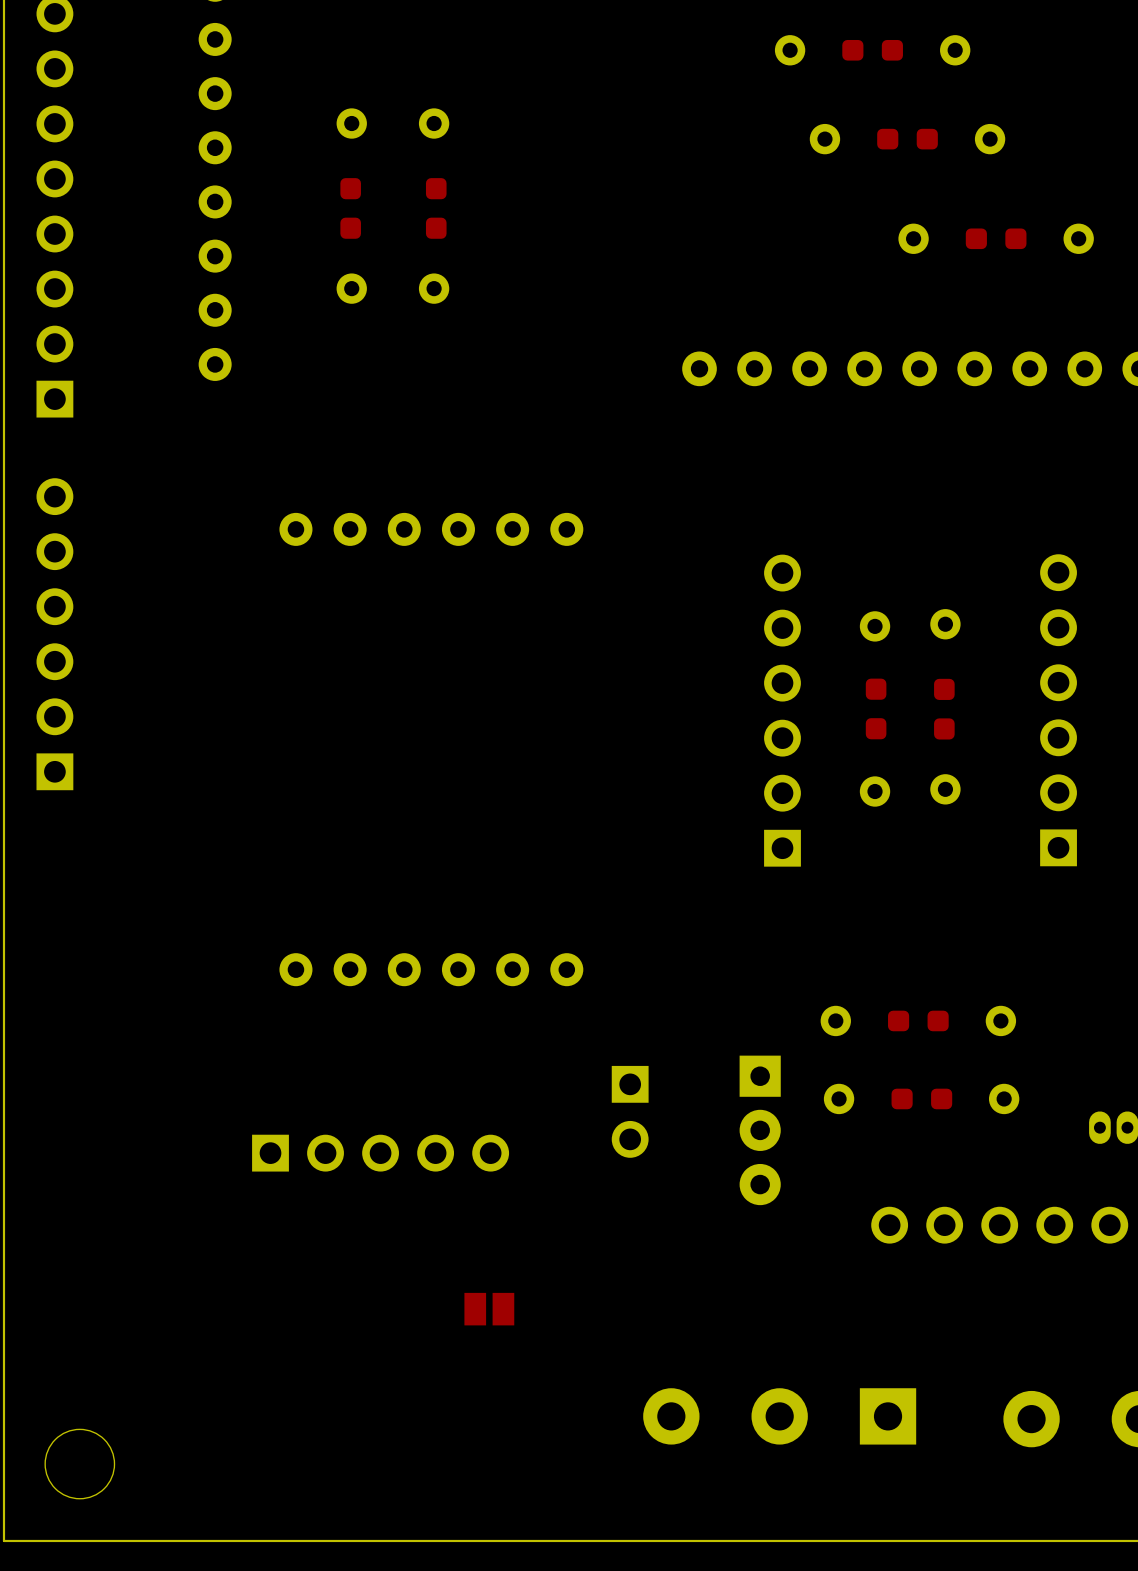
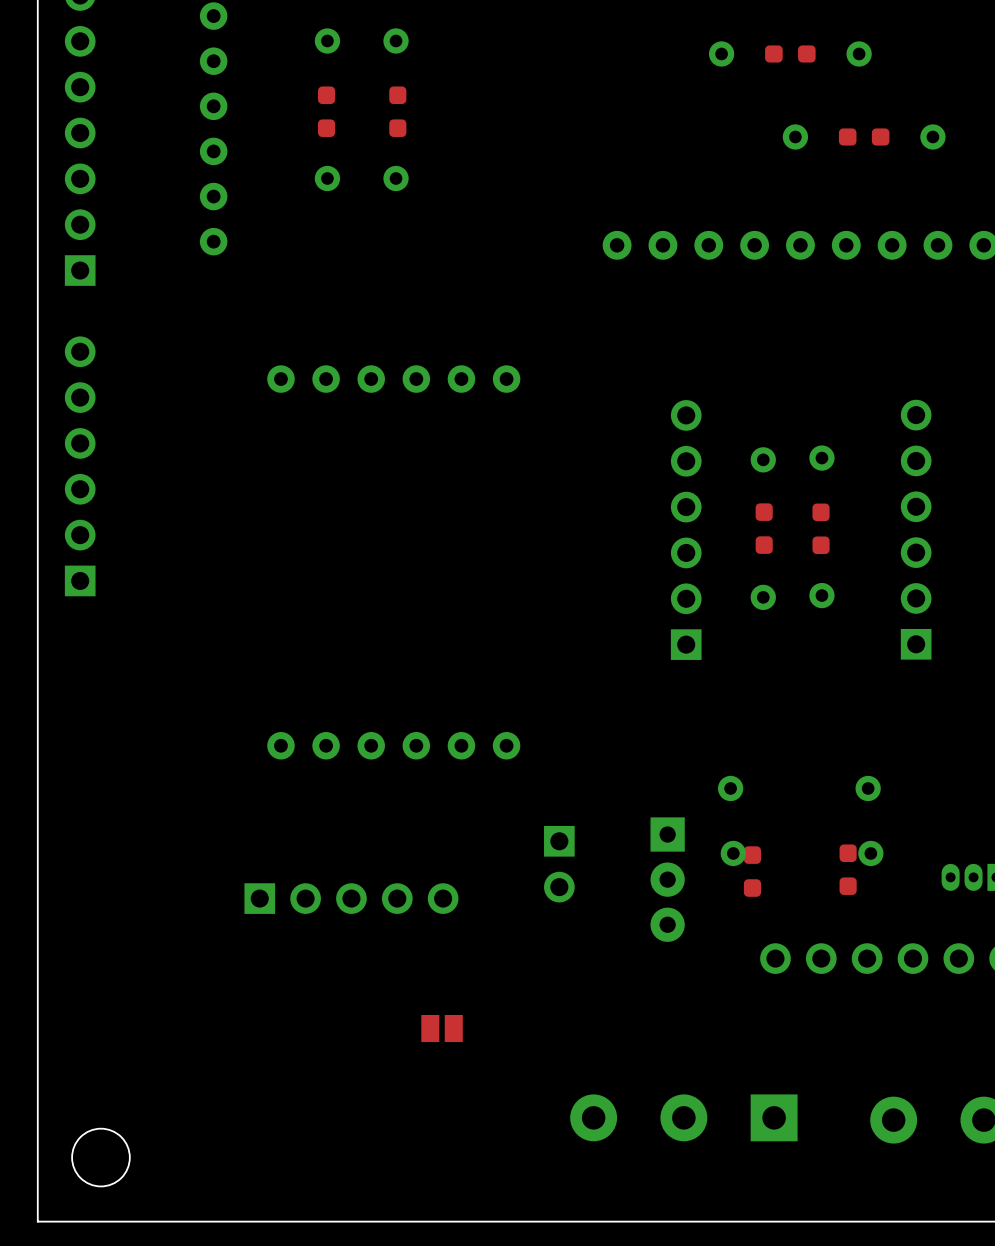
part: (918, 1020) -> none
part: (921, 1098) -> none
part: none -> (848, 869)
part: none -> (752, 871)

